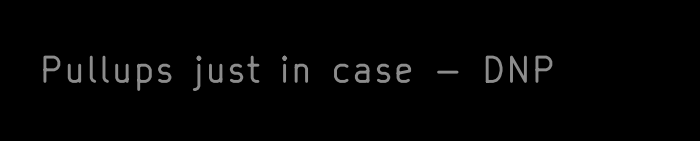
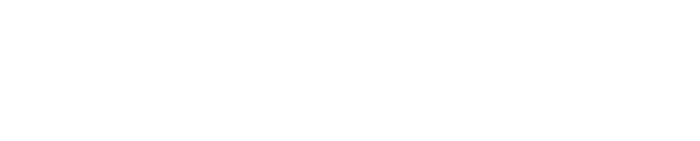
text: Pullups just in case - DNP (297, 73) -> none

